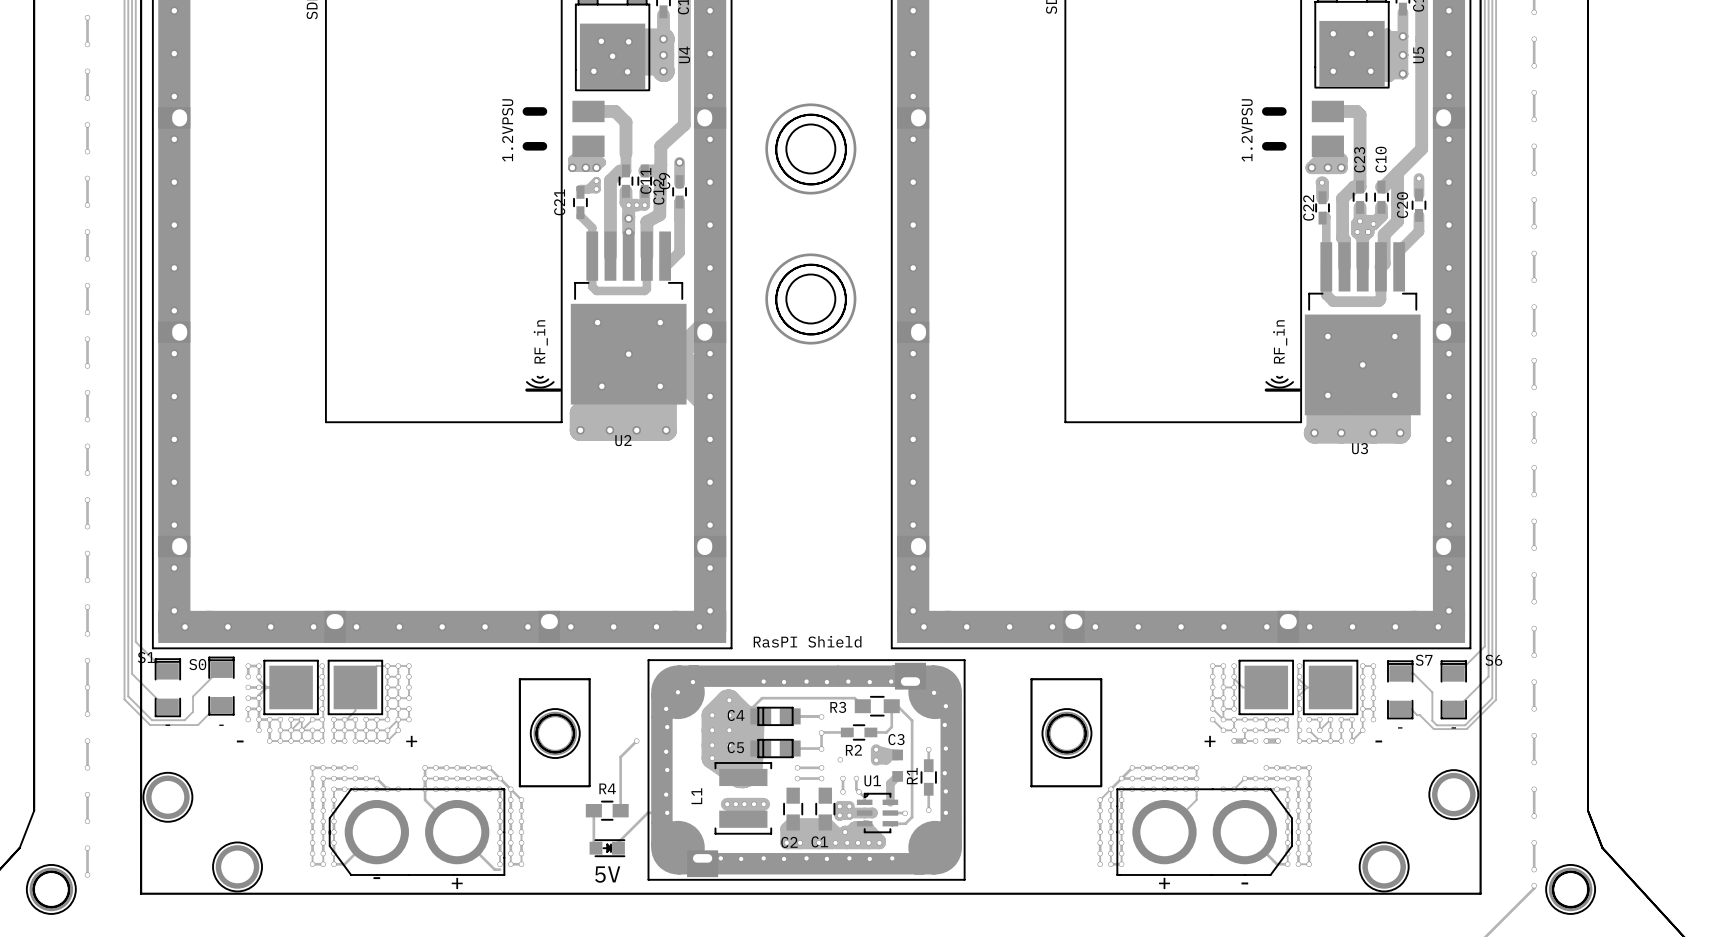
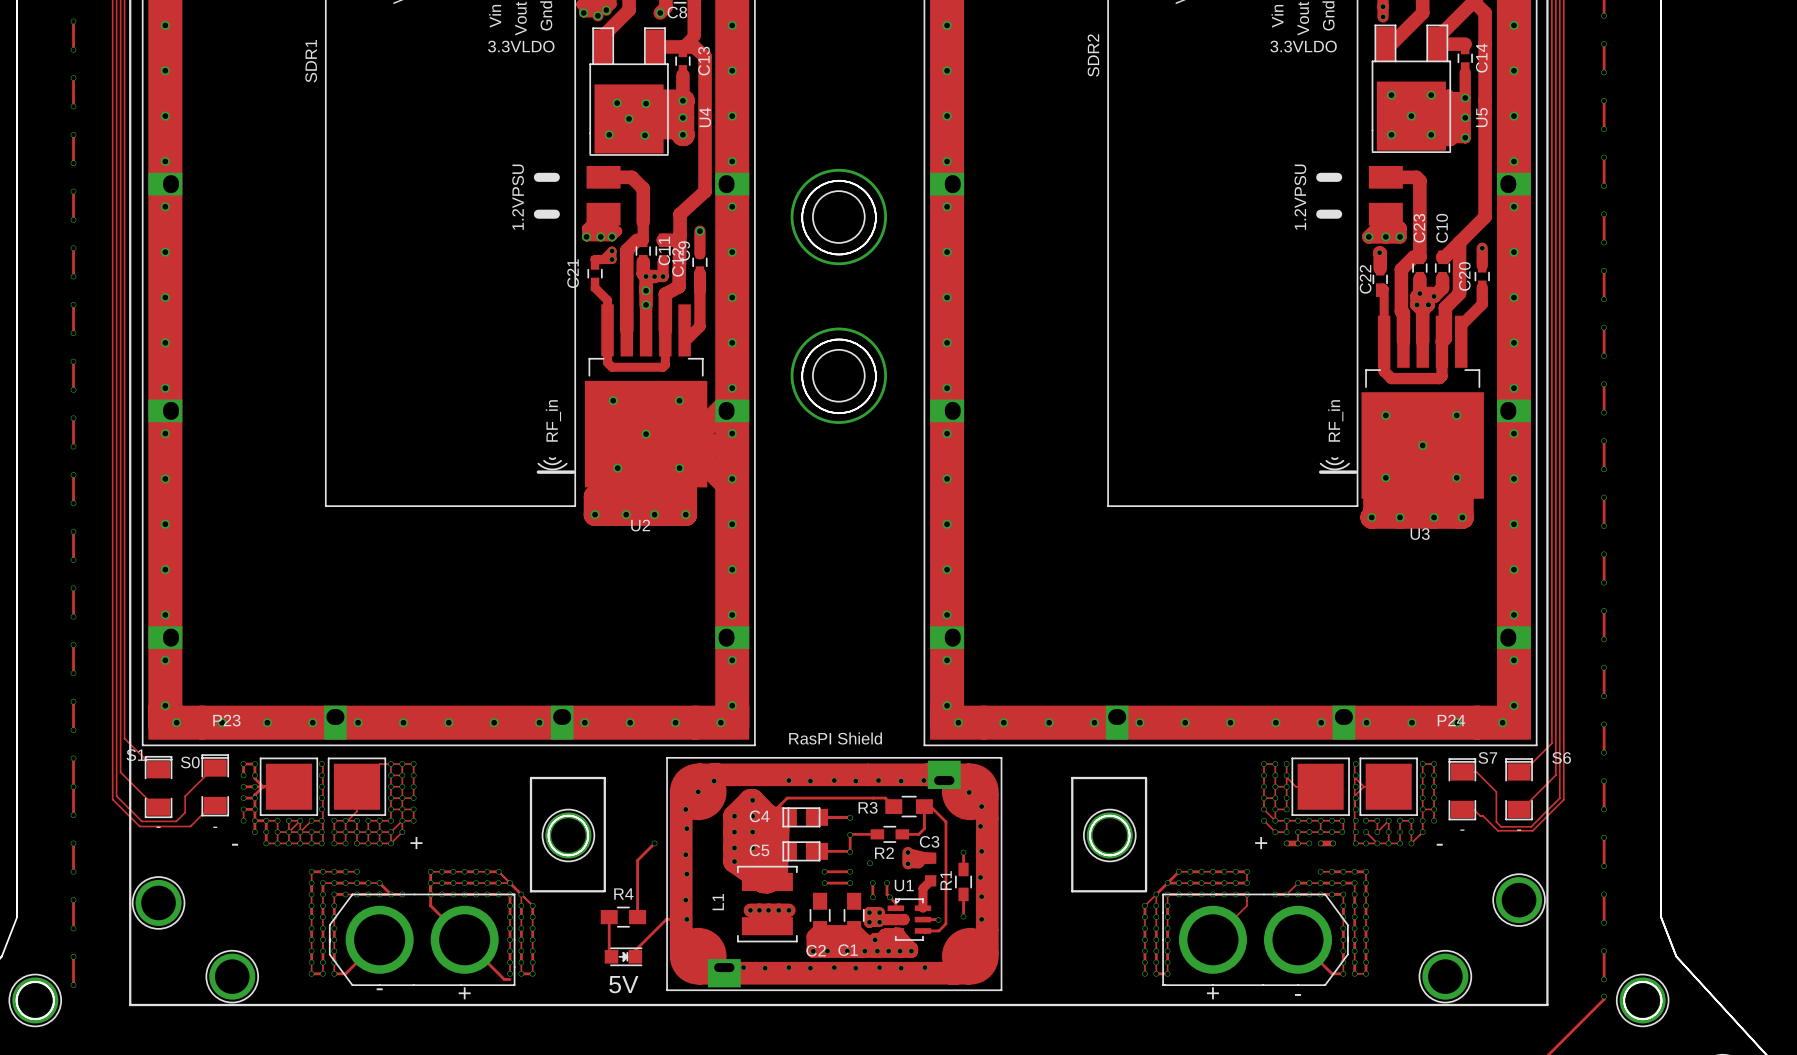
P23: none -> (226, 720)
P24: none -> (1451, 720)

